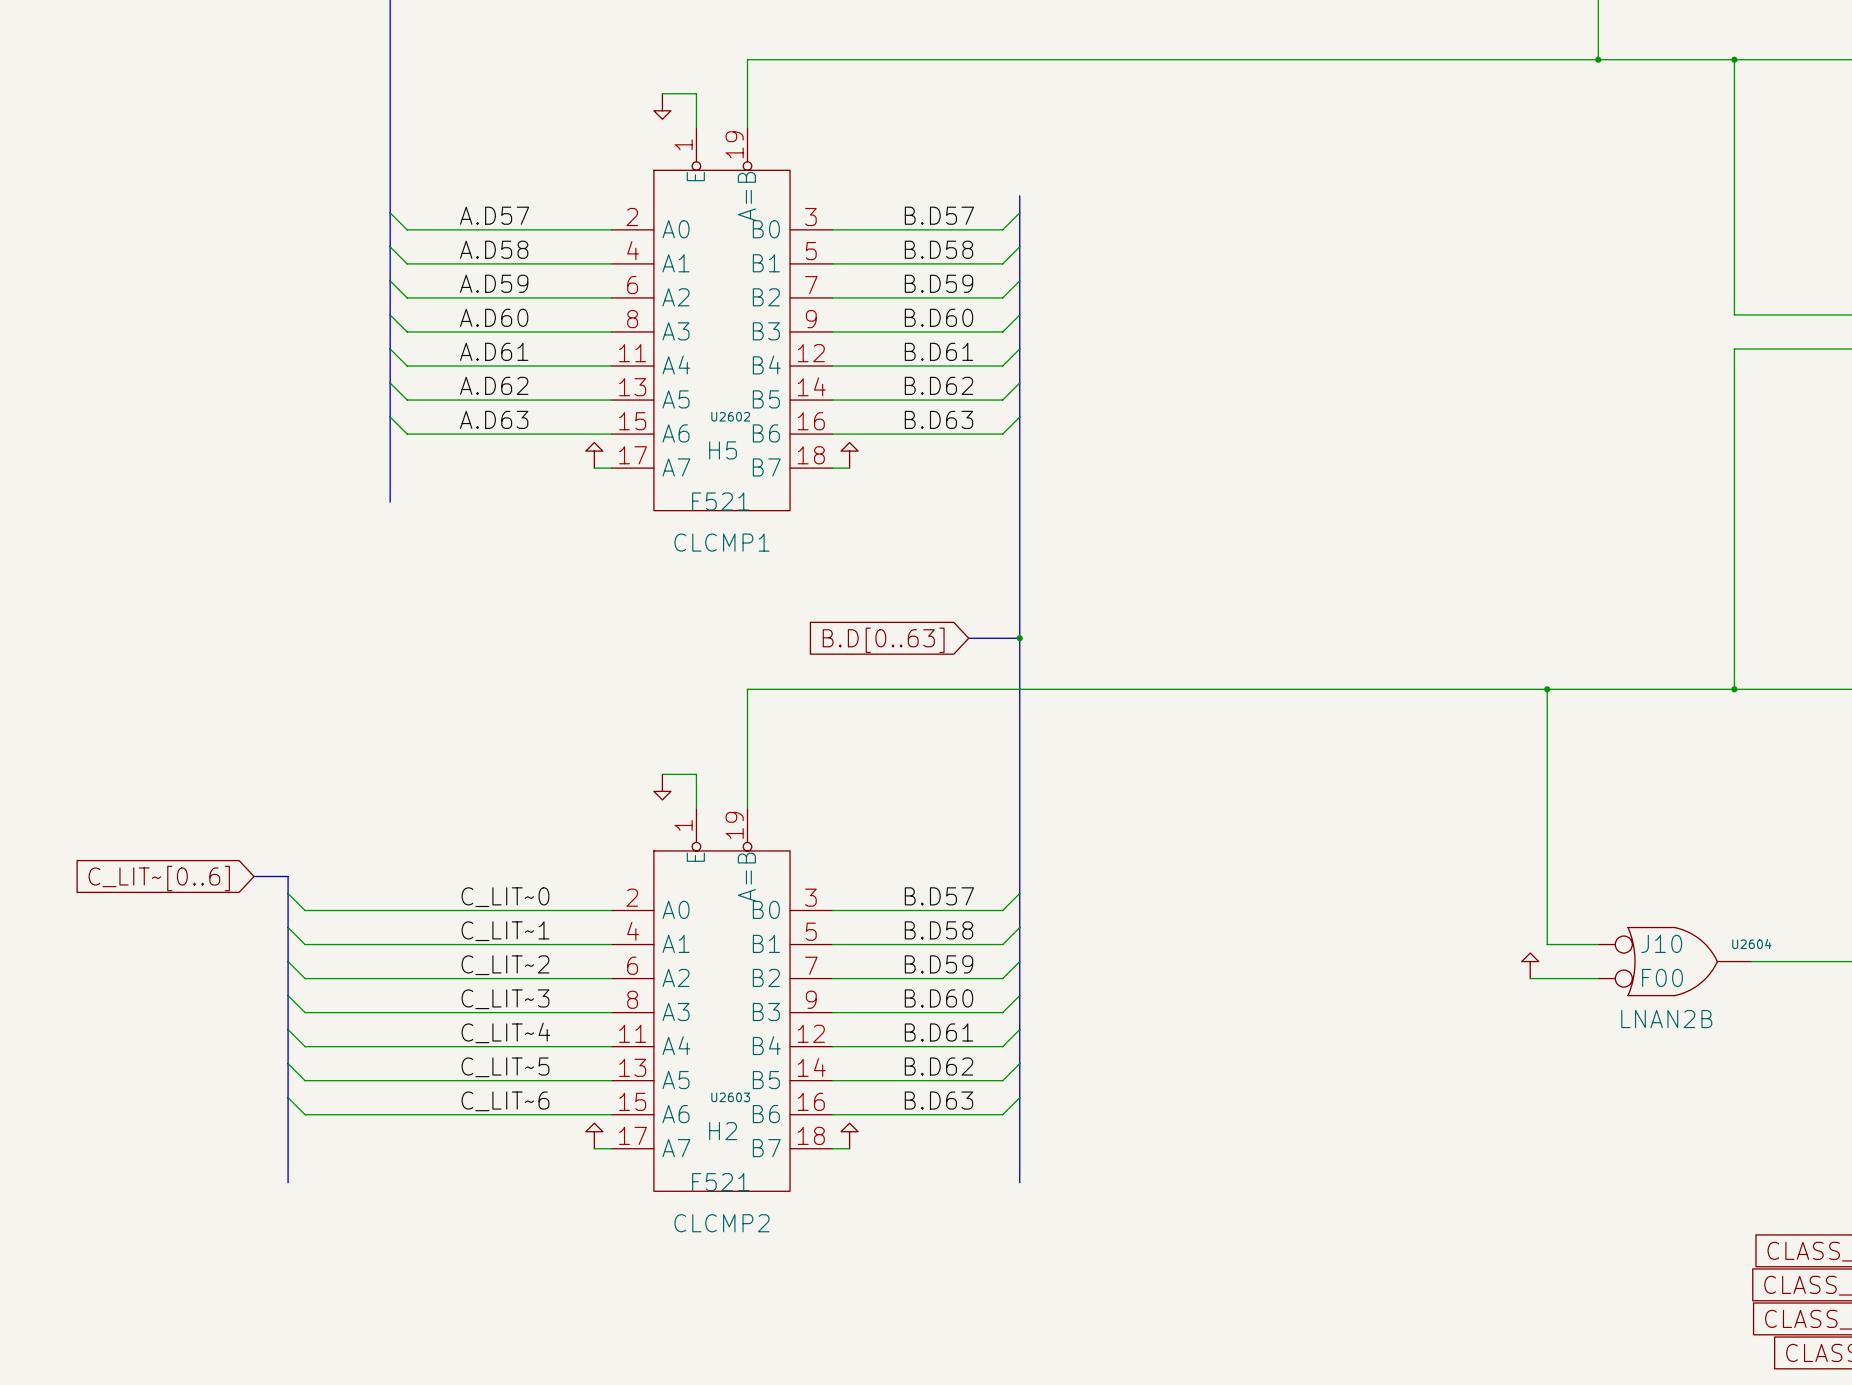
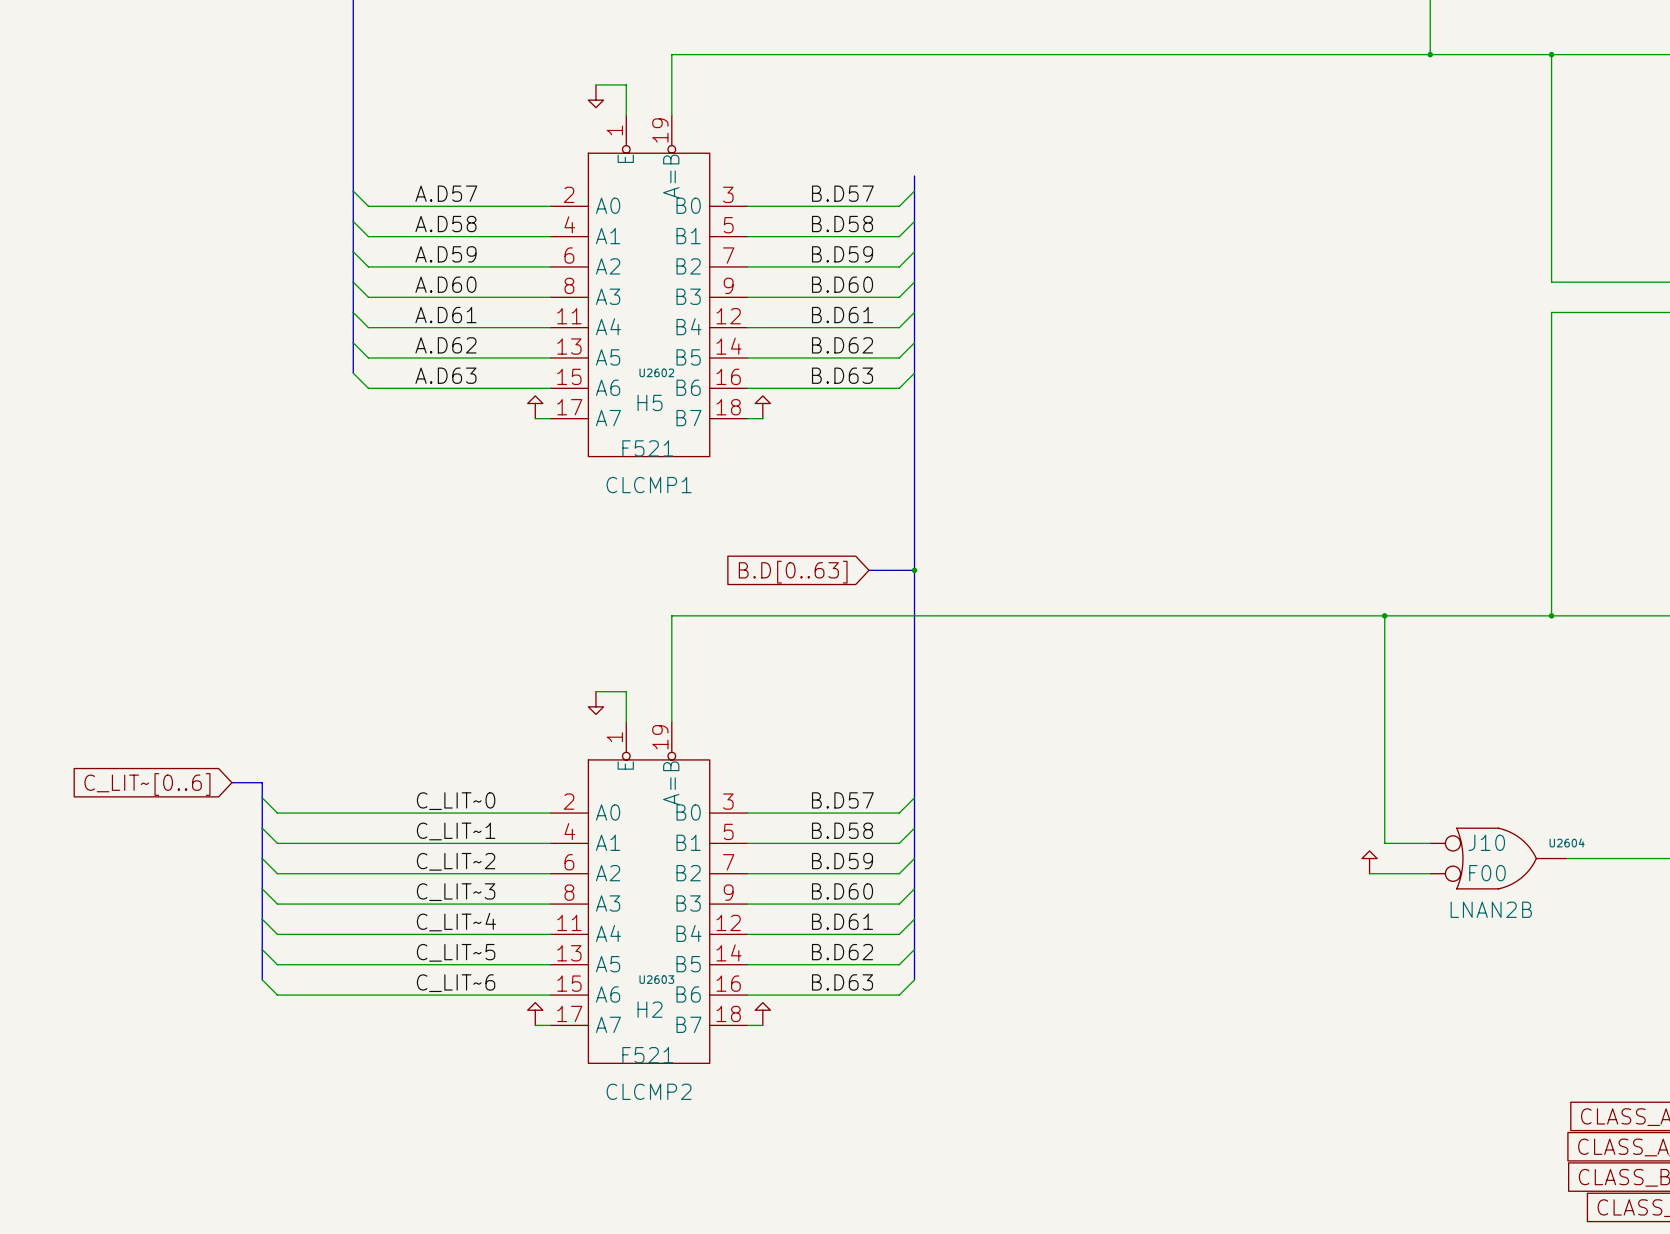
bus: (390, 417) (390, 502) -> none
bus: (288, 1097) (288, 1182) -> none
bus: (1019, 1097) (1019, 1182) -> none

